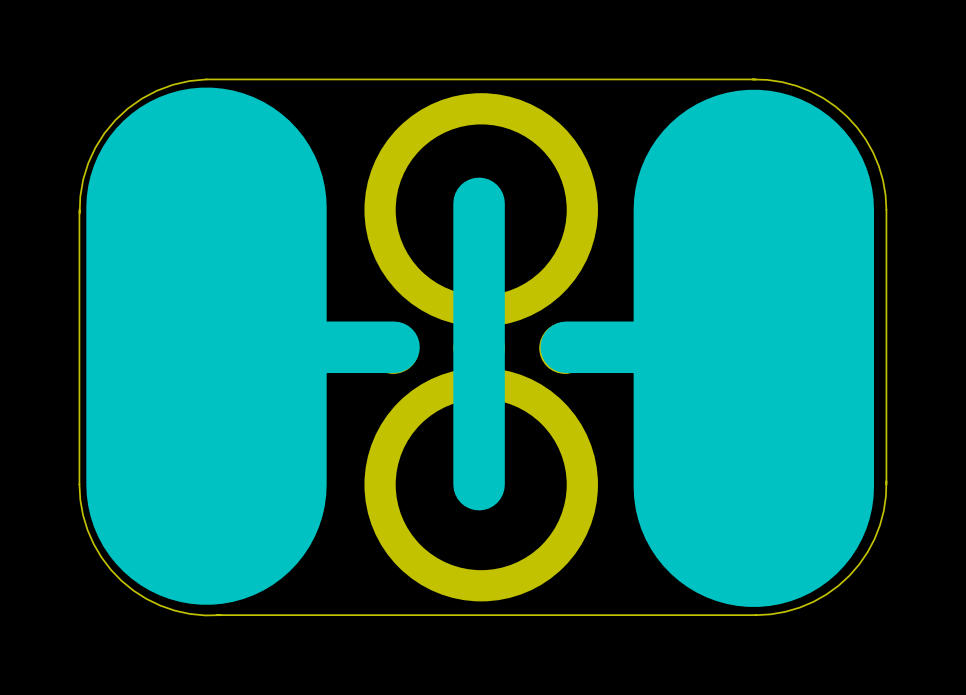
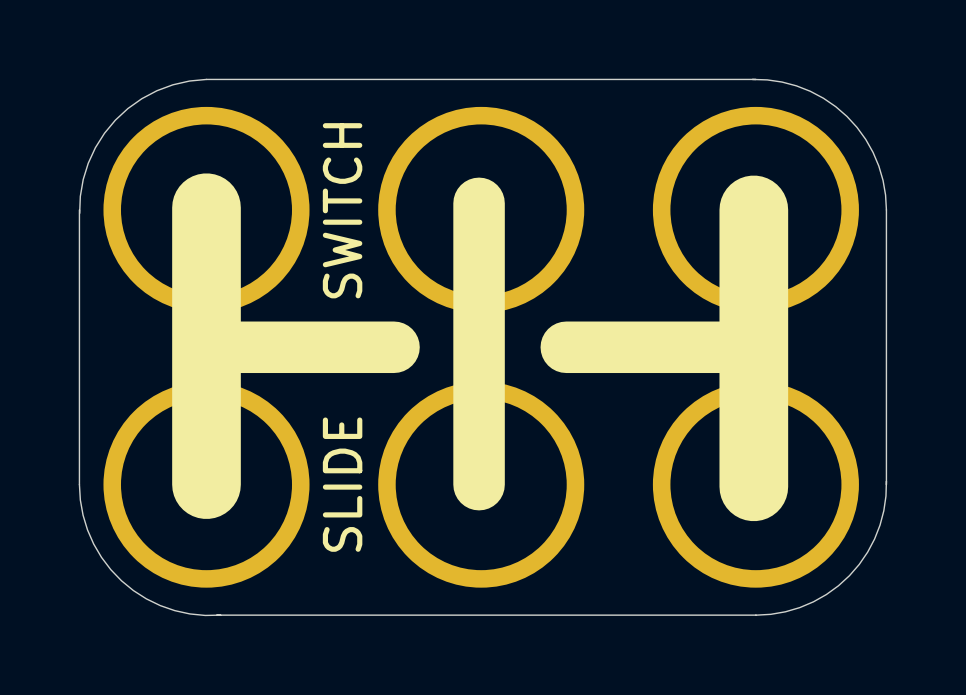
part footprint: [78, 78, 888, 617] -> [78, 78, 888, 617]

